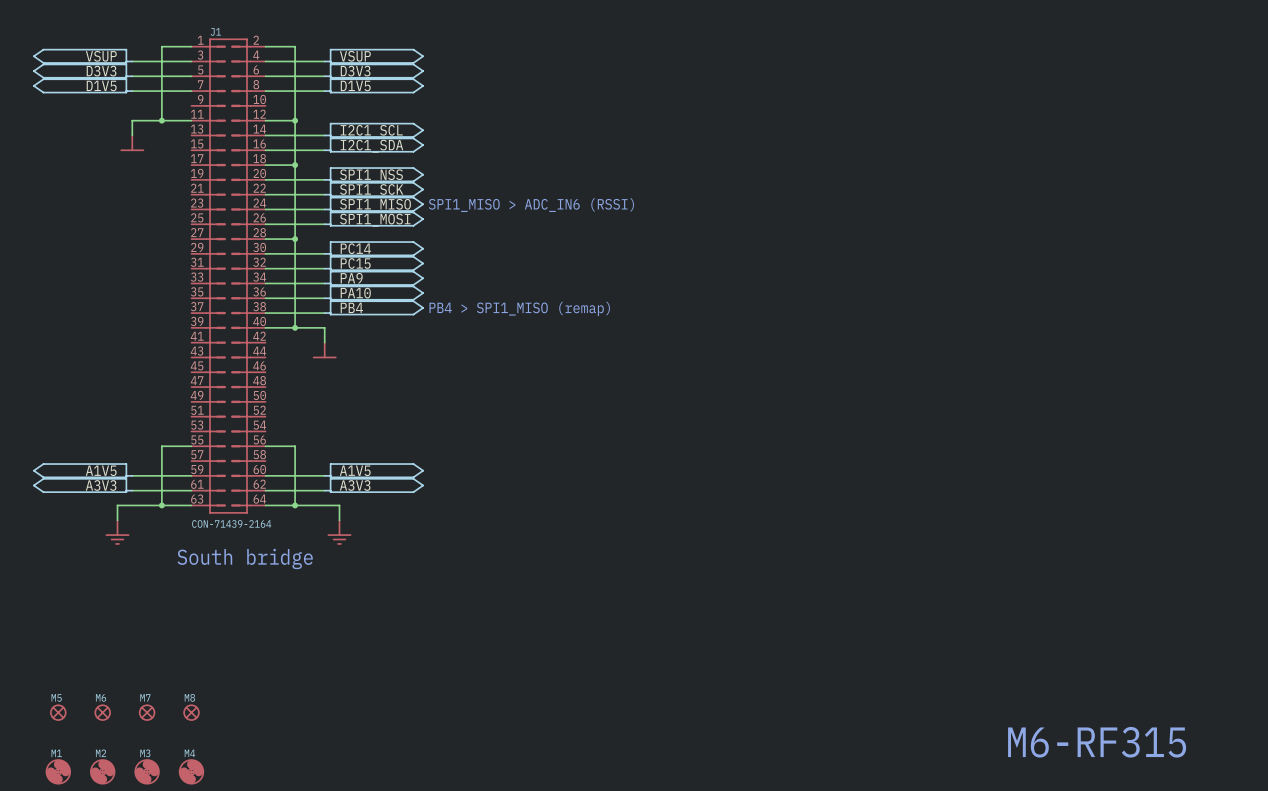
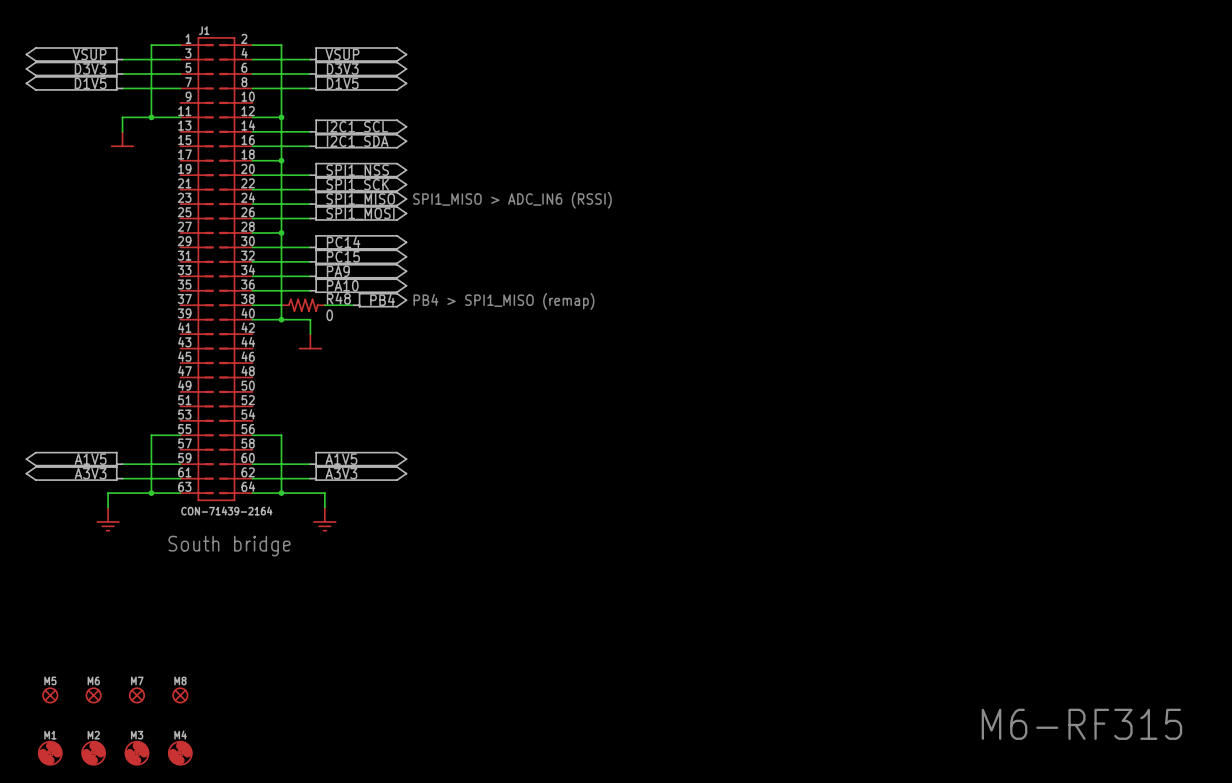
label position: PB4 (351, 307) -> PB4 (382, 299)
part: (373, 307) -> none
part: none -> (380, 300)
R48: none -> 0 (303, 305)

